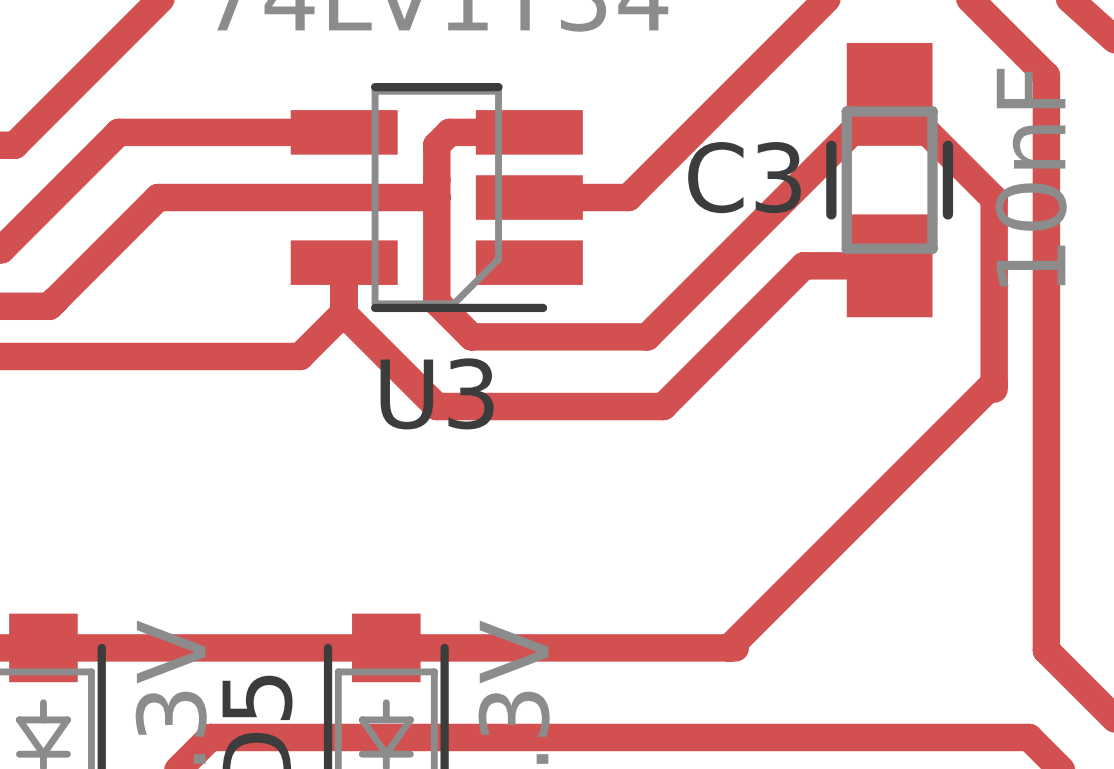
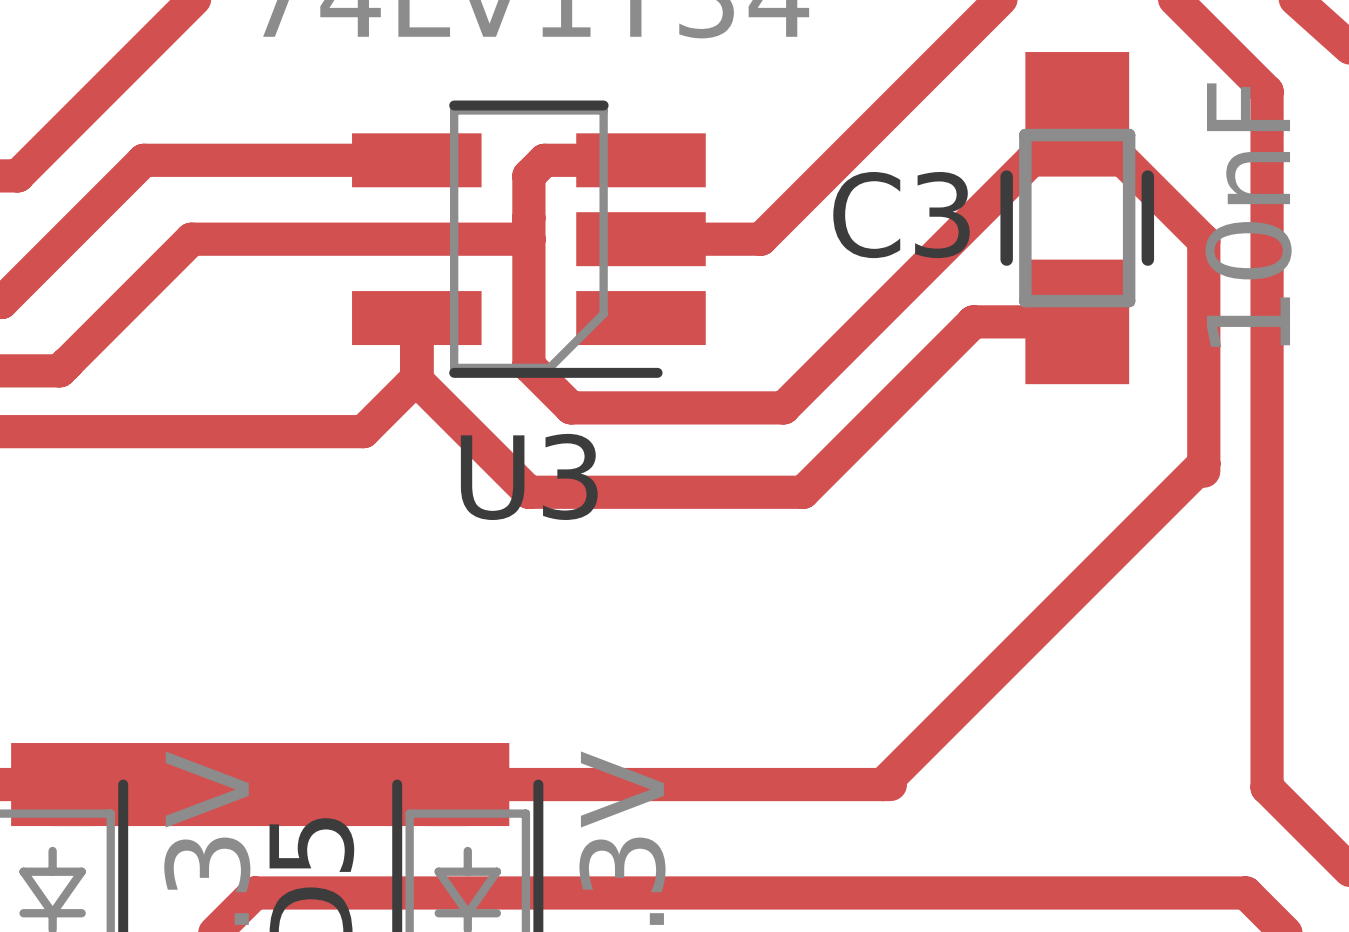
top track width: thin (43, 647) (386, 647) -> thick (52, 784) (467, 784)

